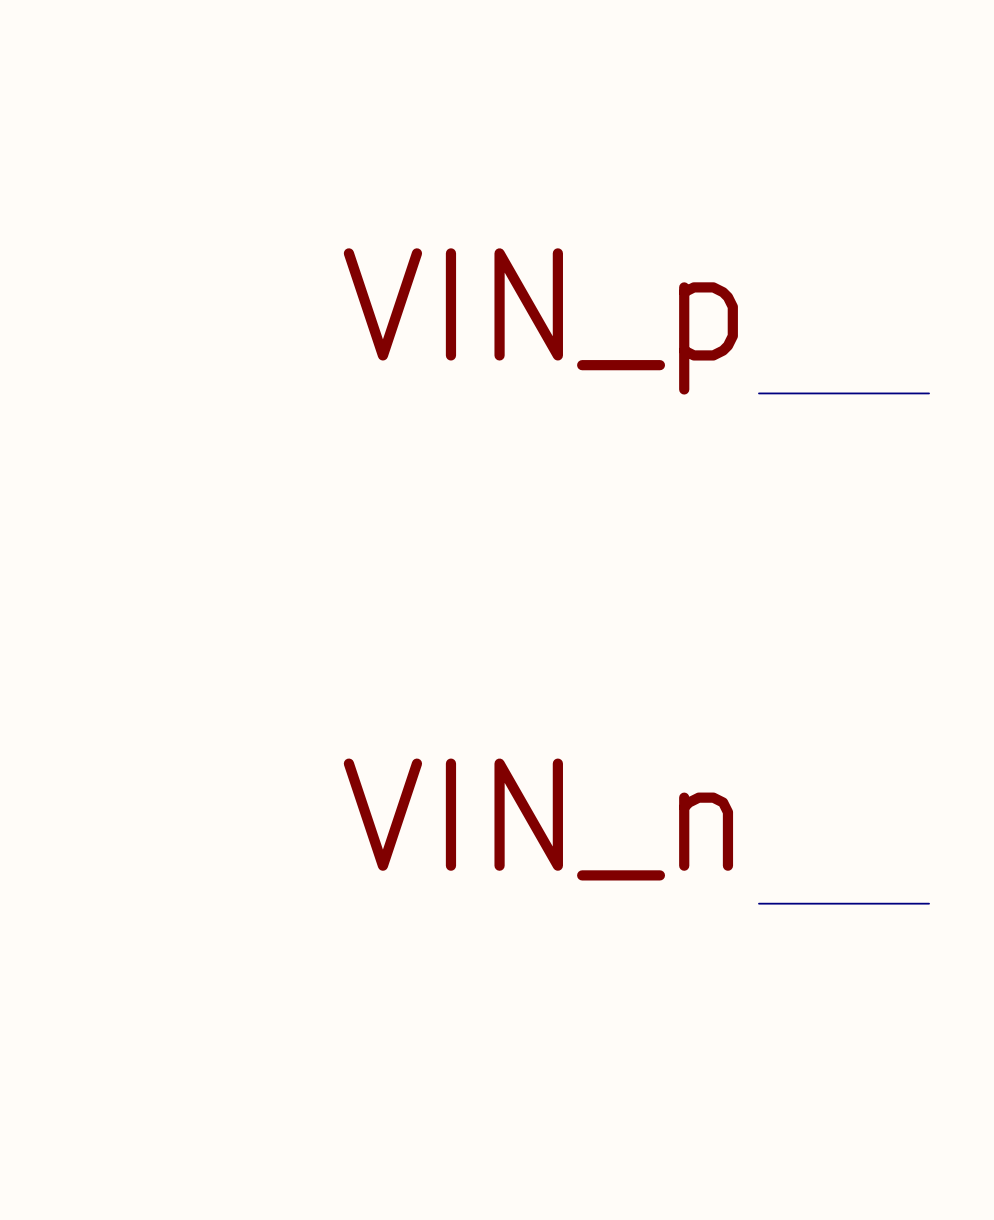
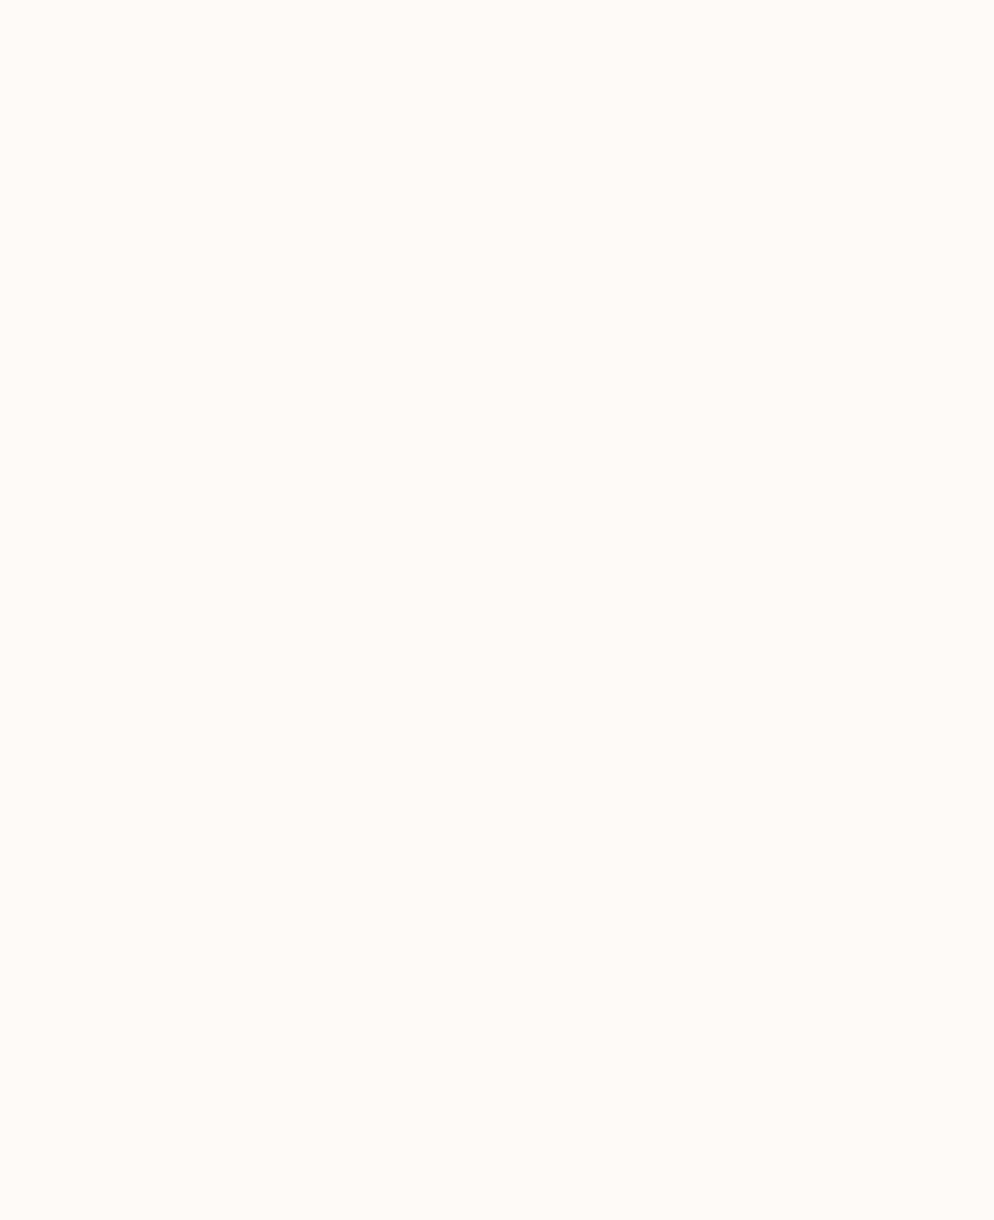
label: VIN_p (540, 321) -> none
wire: (758, 393) (929, 393) -> none
label: VIN_n (538, 819) -> none
wire: (758, 903) (929, 903) -> none

